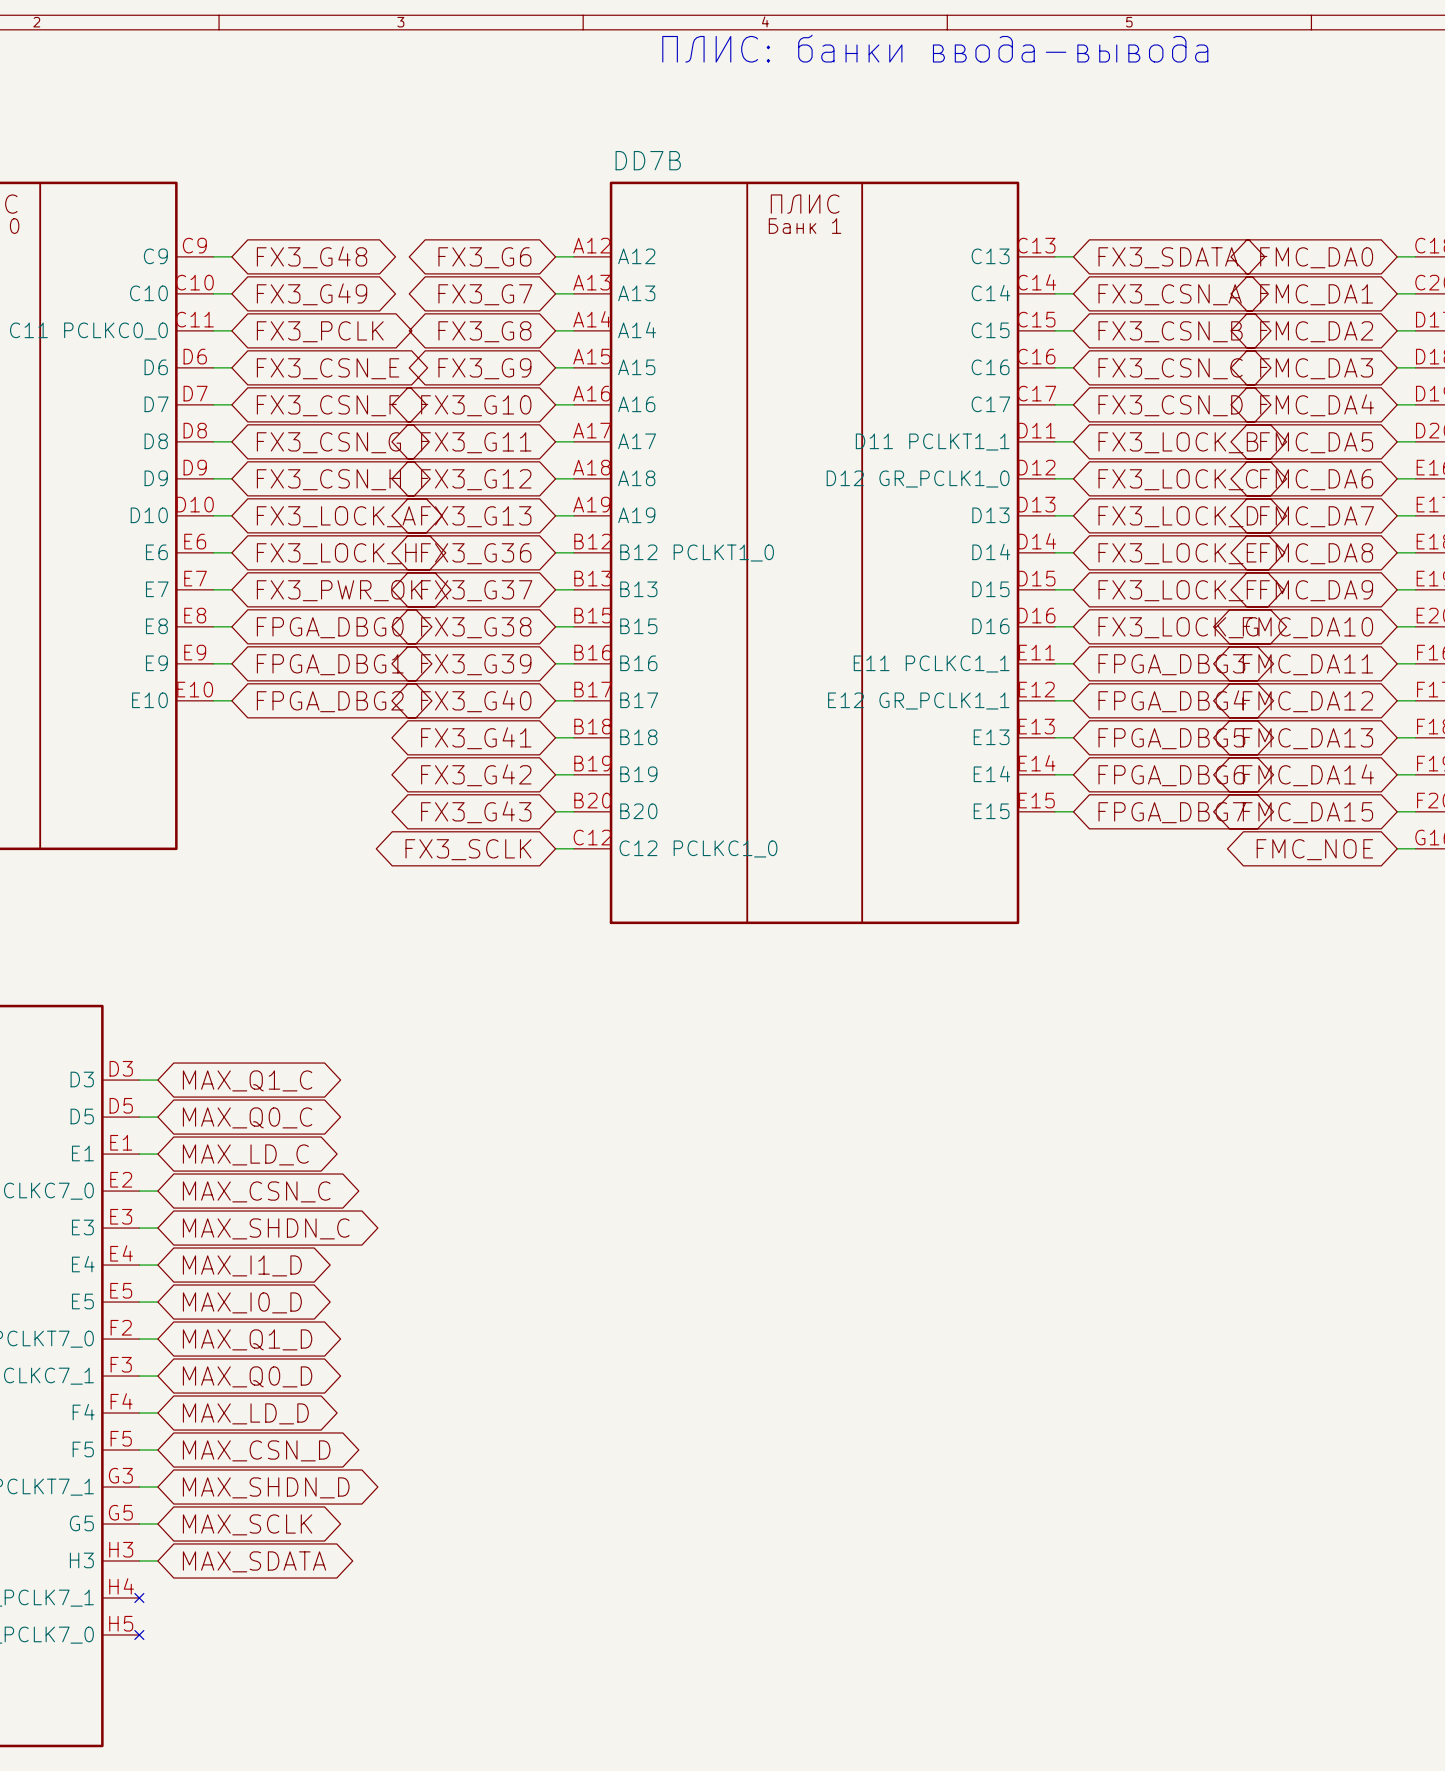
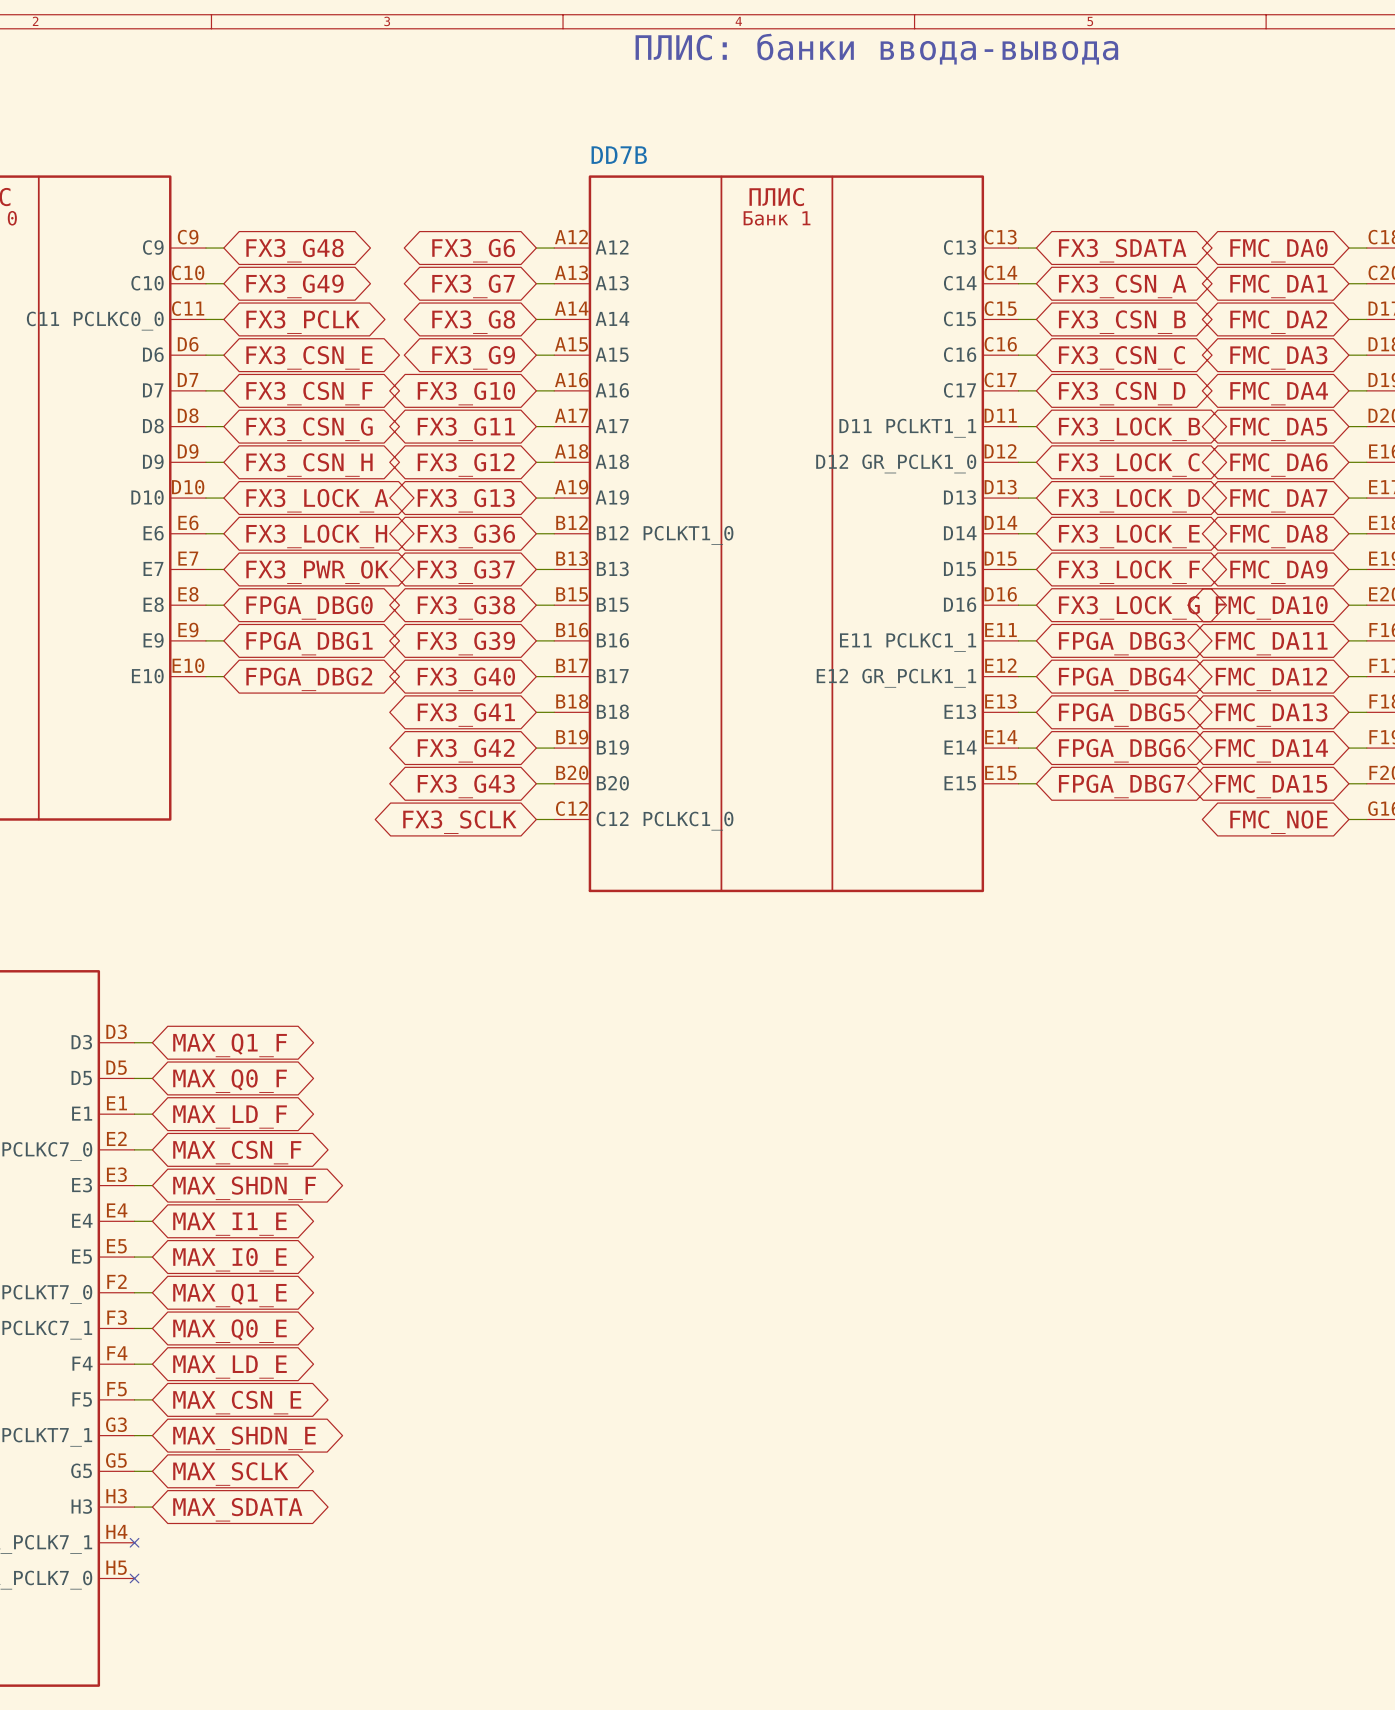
global label: MAX_Q1_C (247, 1080) -> MAX_Q1_F (230, 1045)
global label: MAX_Q0_C (247, 1117) -> MAX_Q0_F (230, 1081)
global label: MAX_LD_C (245, 1154) -> MAX_LD_F (230, 1117)
global label: MAX_CSN_C (256, 1191) -> MAX_CSN_F (237, 1152)
global label: MAX_SHDN_C (266, 1228) -> MAX_SHDN_F (244, 1188)
global label: MAX_I1_D (242, 1265) -> MAX_I1_E (229, 1224)
global label: MAX_I0_D (242, 1302) -> MAX_I0_E (229, 1259)
global label: MAX_Q1_D (247, 1339) -> MAX_Q1_E (229, 1295)
global label: MAX_Q0_D (247, 1376) -> MAX_Q0_E (229, 1331)
global label: MAX_LD_D (245, 1413) -> MAX_LD_E (229, 1367)
global label: MAX_CSN_D (256, 1450) -> MAX_CSN_E (237, 1402)
global label: MAX_SHDN_D (266, 1487) -> MAX_SHDN_E (244, 1438)

